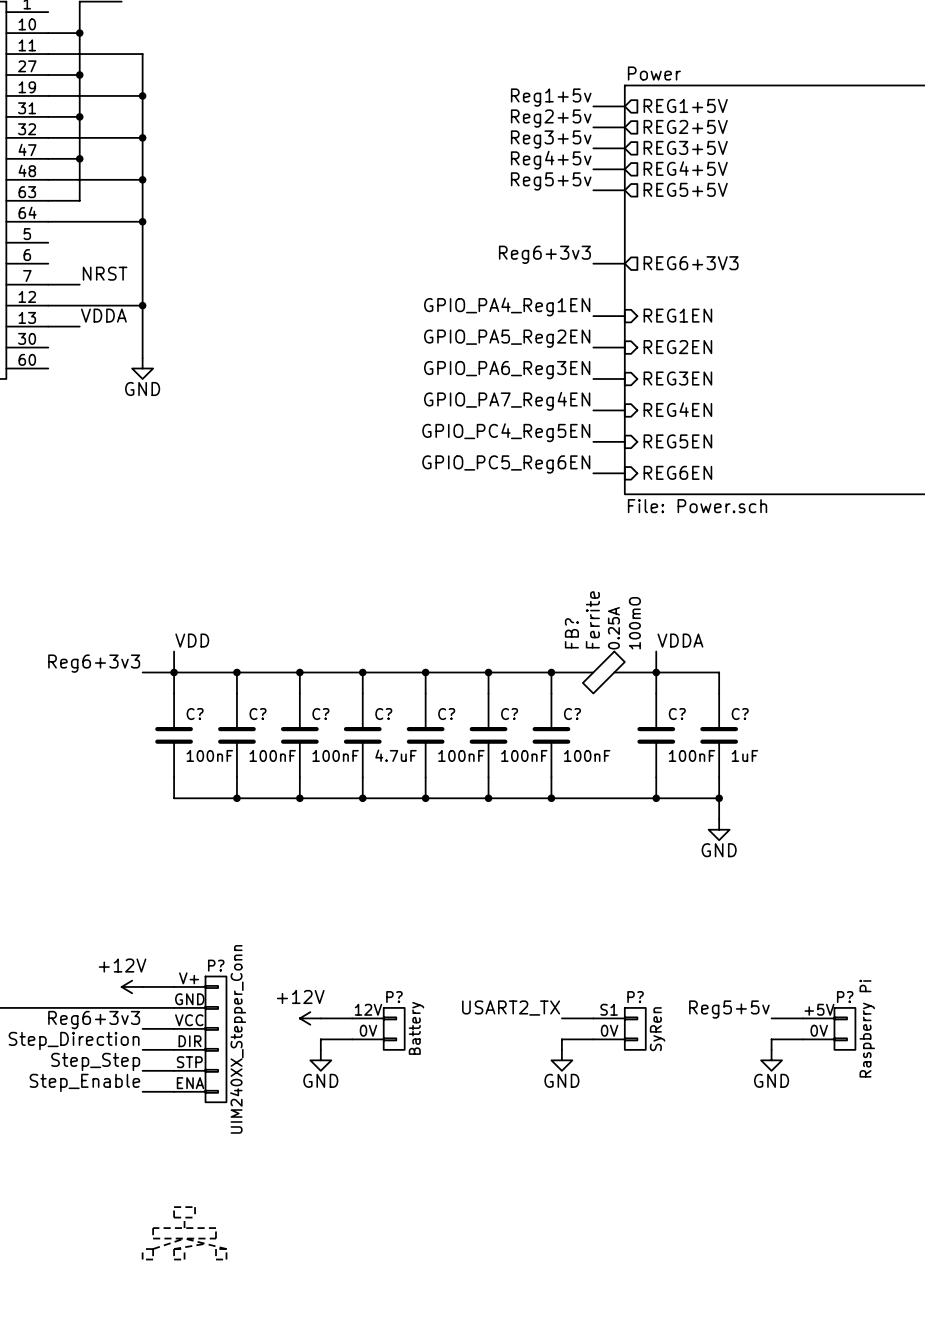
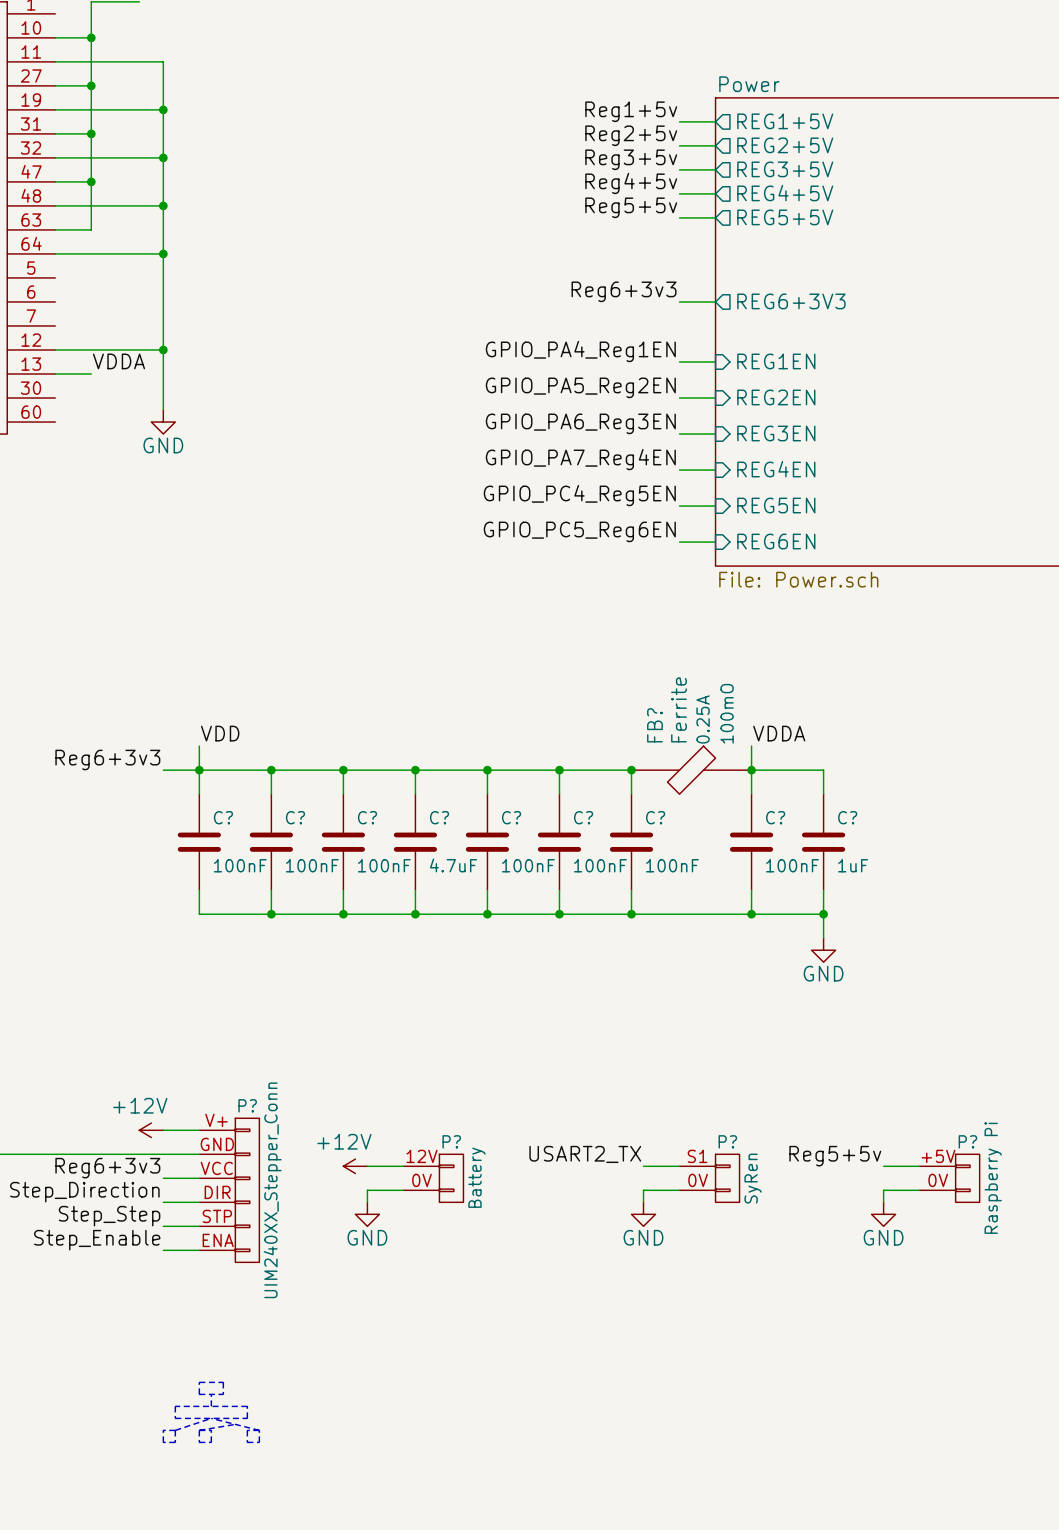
label: NRST (105, 273) -> none
wire: (48, 284) (79, 284) -> none

